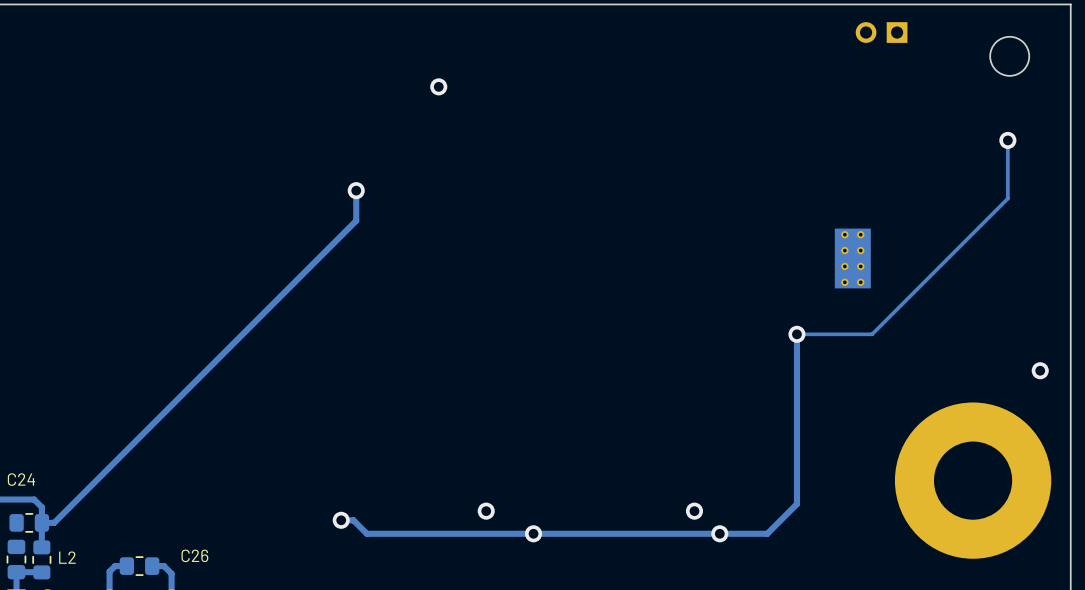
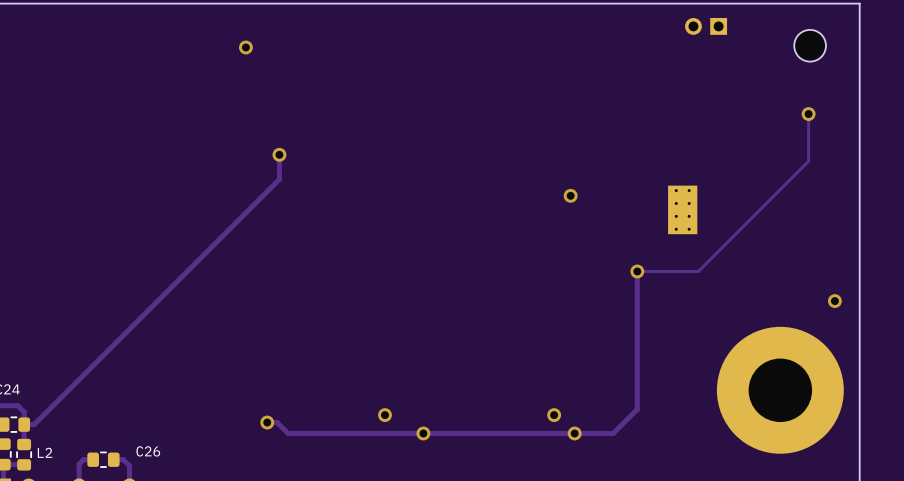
via: none -> (245, 47)
via: (438, 86) -> none
via: none -> (570, 195)

